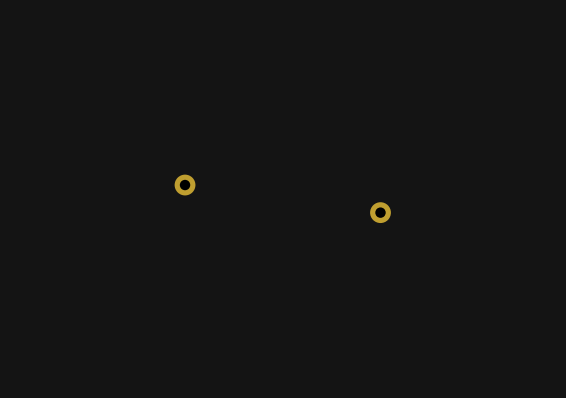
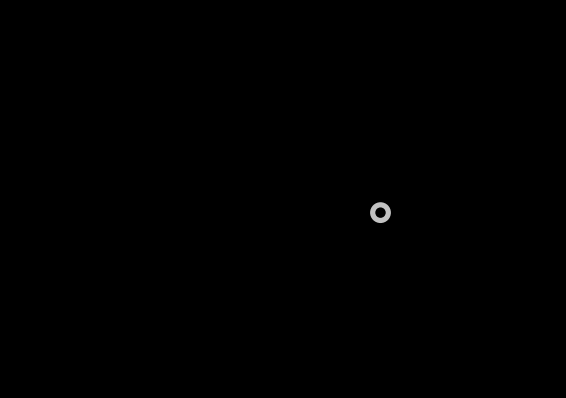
via: (185, 185) -> none

